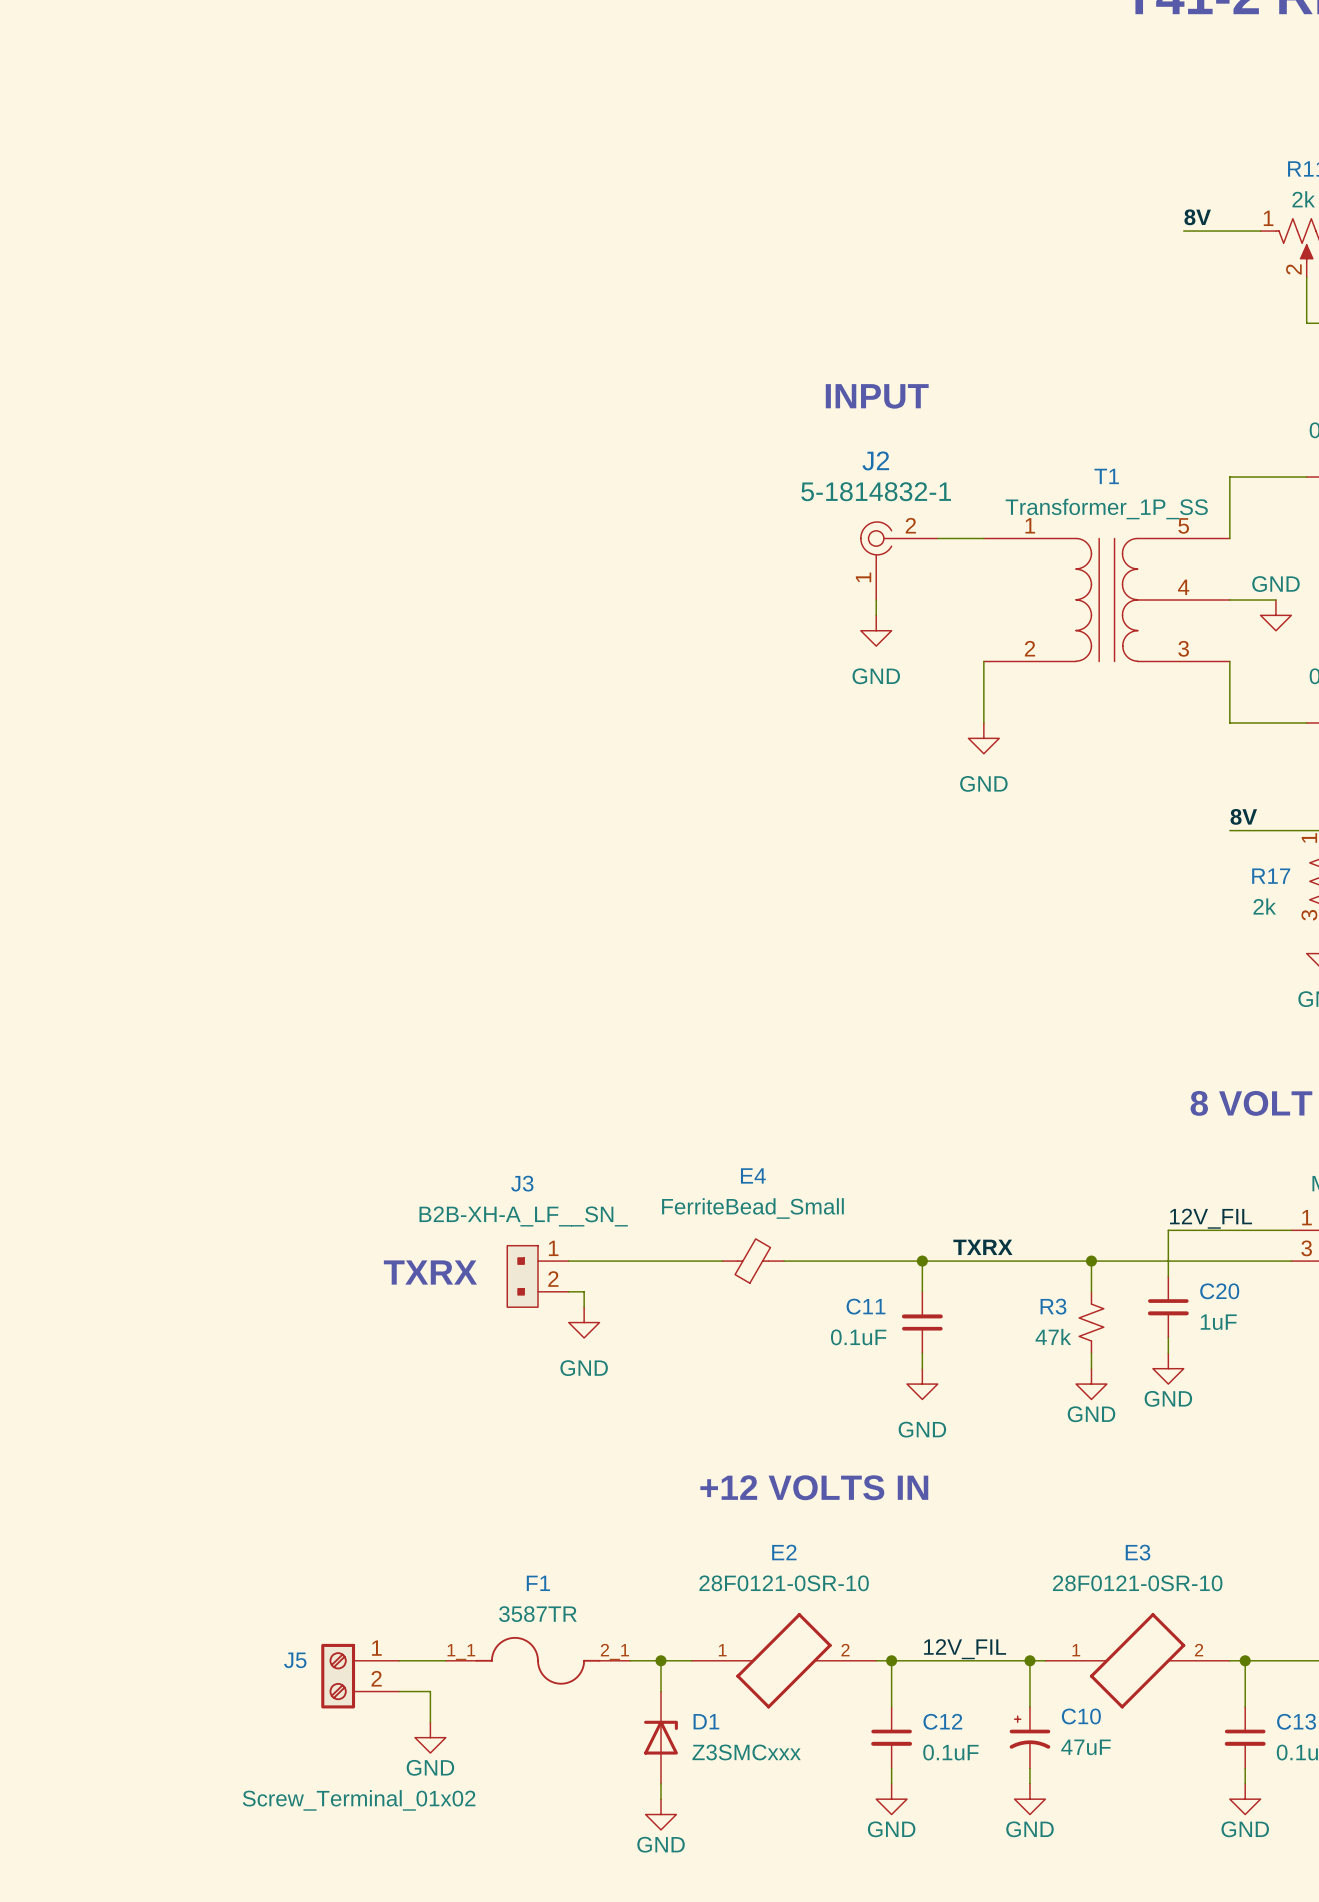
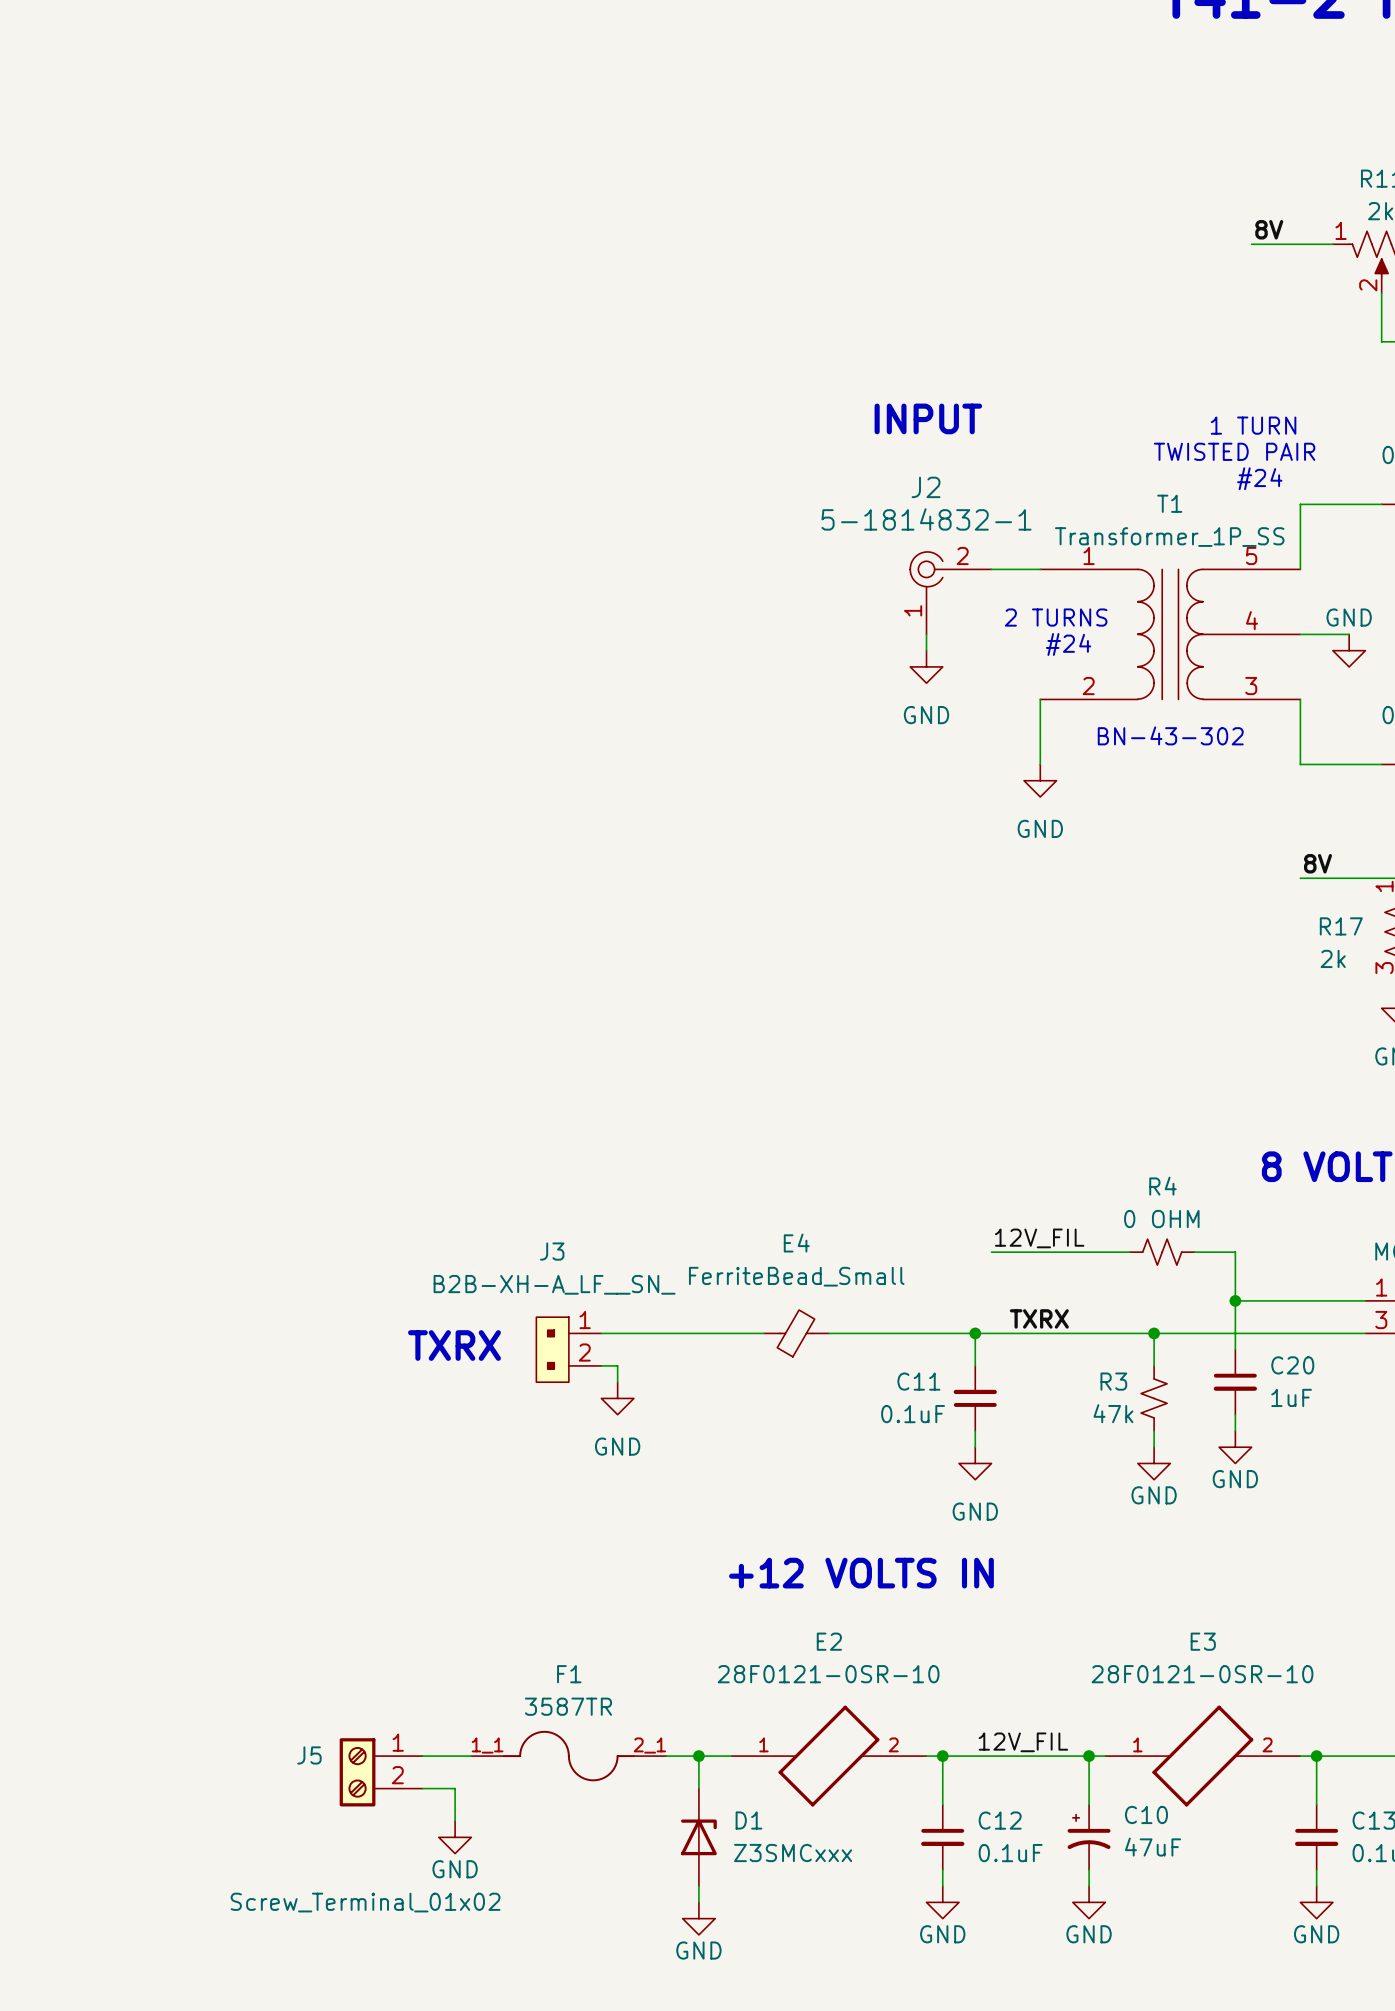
text: none -> 1 TURN (1253, 425)
text: none -> TWISTED PAIR (1234, 451)
text: none -> #24 (1259, 478)
text: none -> 2 TURNS (1056, 617)
text: none -> #24 (1068, 644)
text: none -> BN-43-302 (1170, 735)
wire: none -> (991, 1252) (1129, 1252)
R4: none -> 0 OHM (1162, 1252)
wire: none -> (1194, 1252) (1235, 1252) (1235, 1300)
label position: 12V_FIL (1211, 1218) -> 12V_FIL (1039, 1238)
junction: none -> (1235, 1300)

